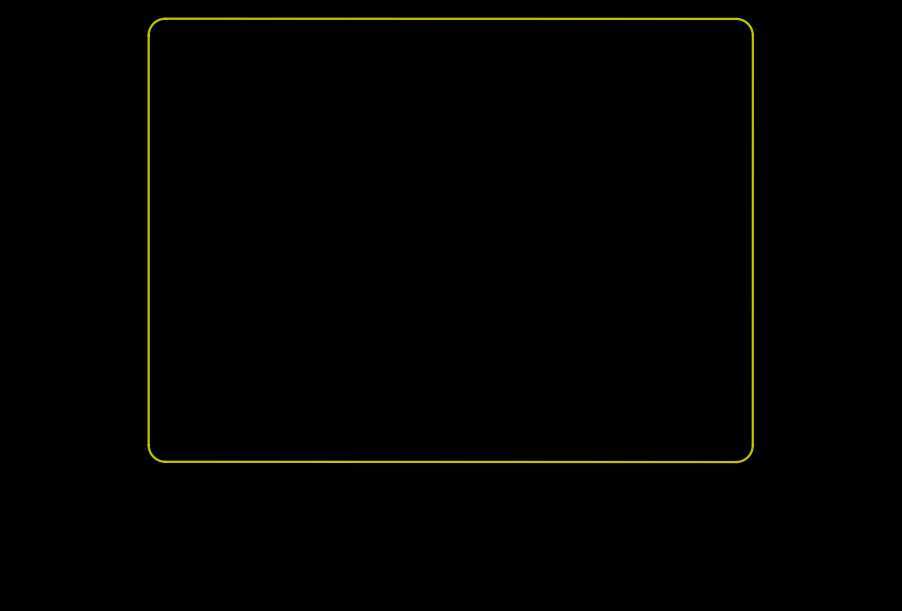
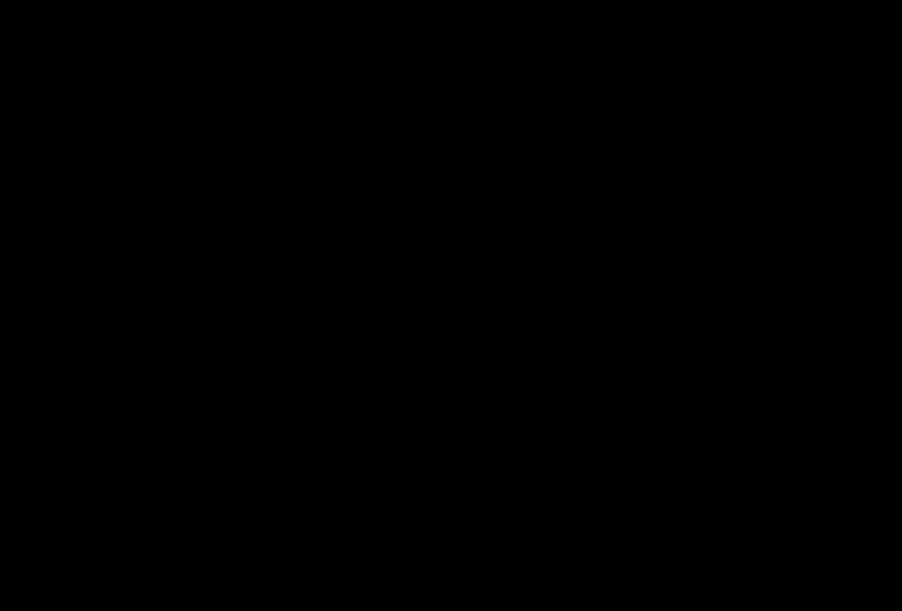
board edge: (736, 18) (165, 18) (154, 22) (150, 28) (148, 35) (148, 445) (152, 455) (158, 460) (165, 461) (736, 462) (746, 458) (751, 452) (752, 445) (752, 35) (747, 23) (736, 18) -> none

